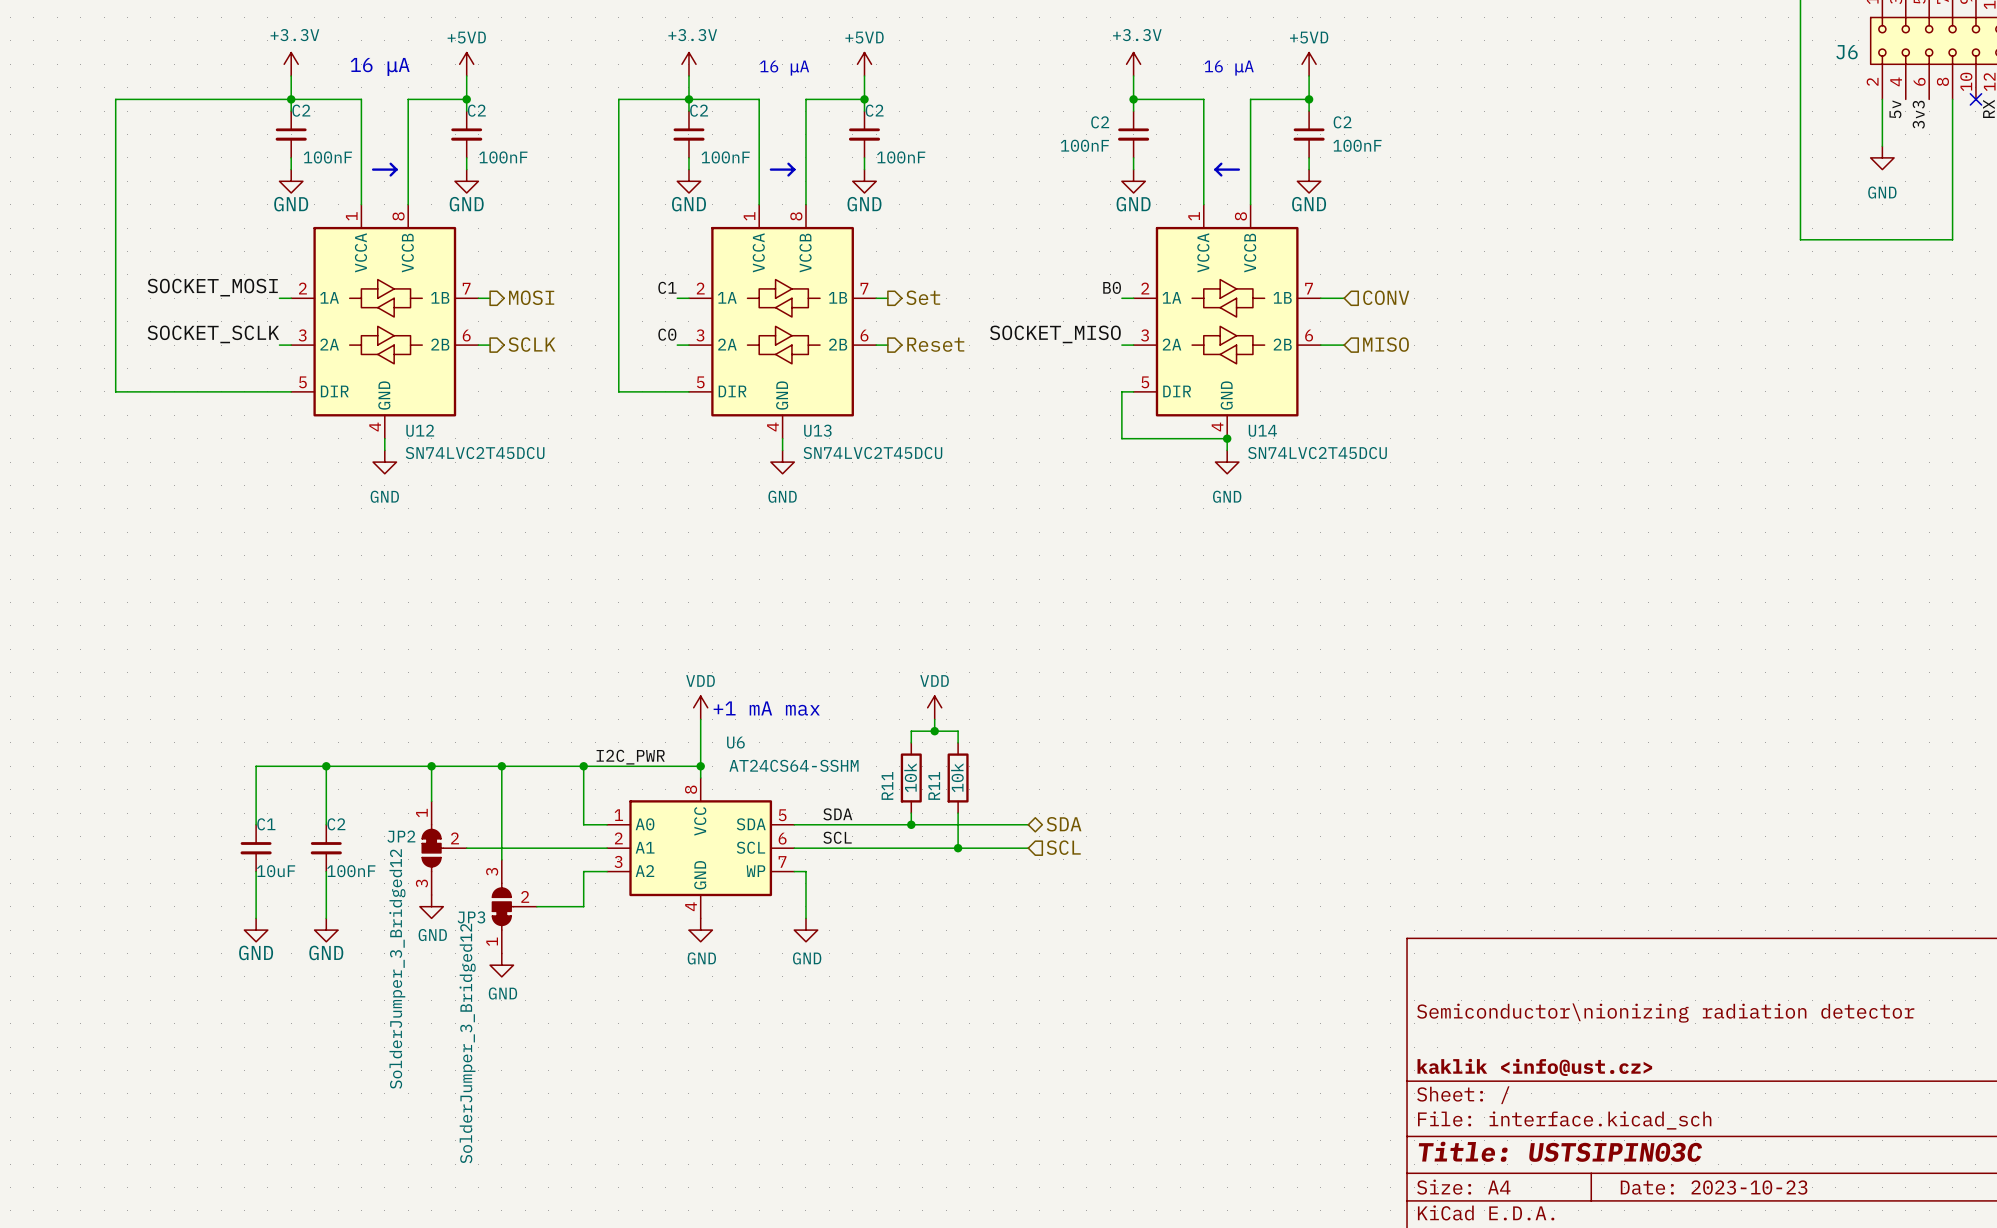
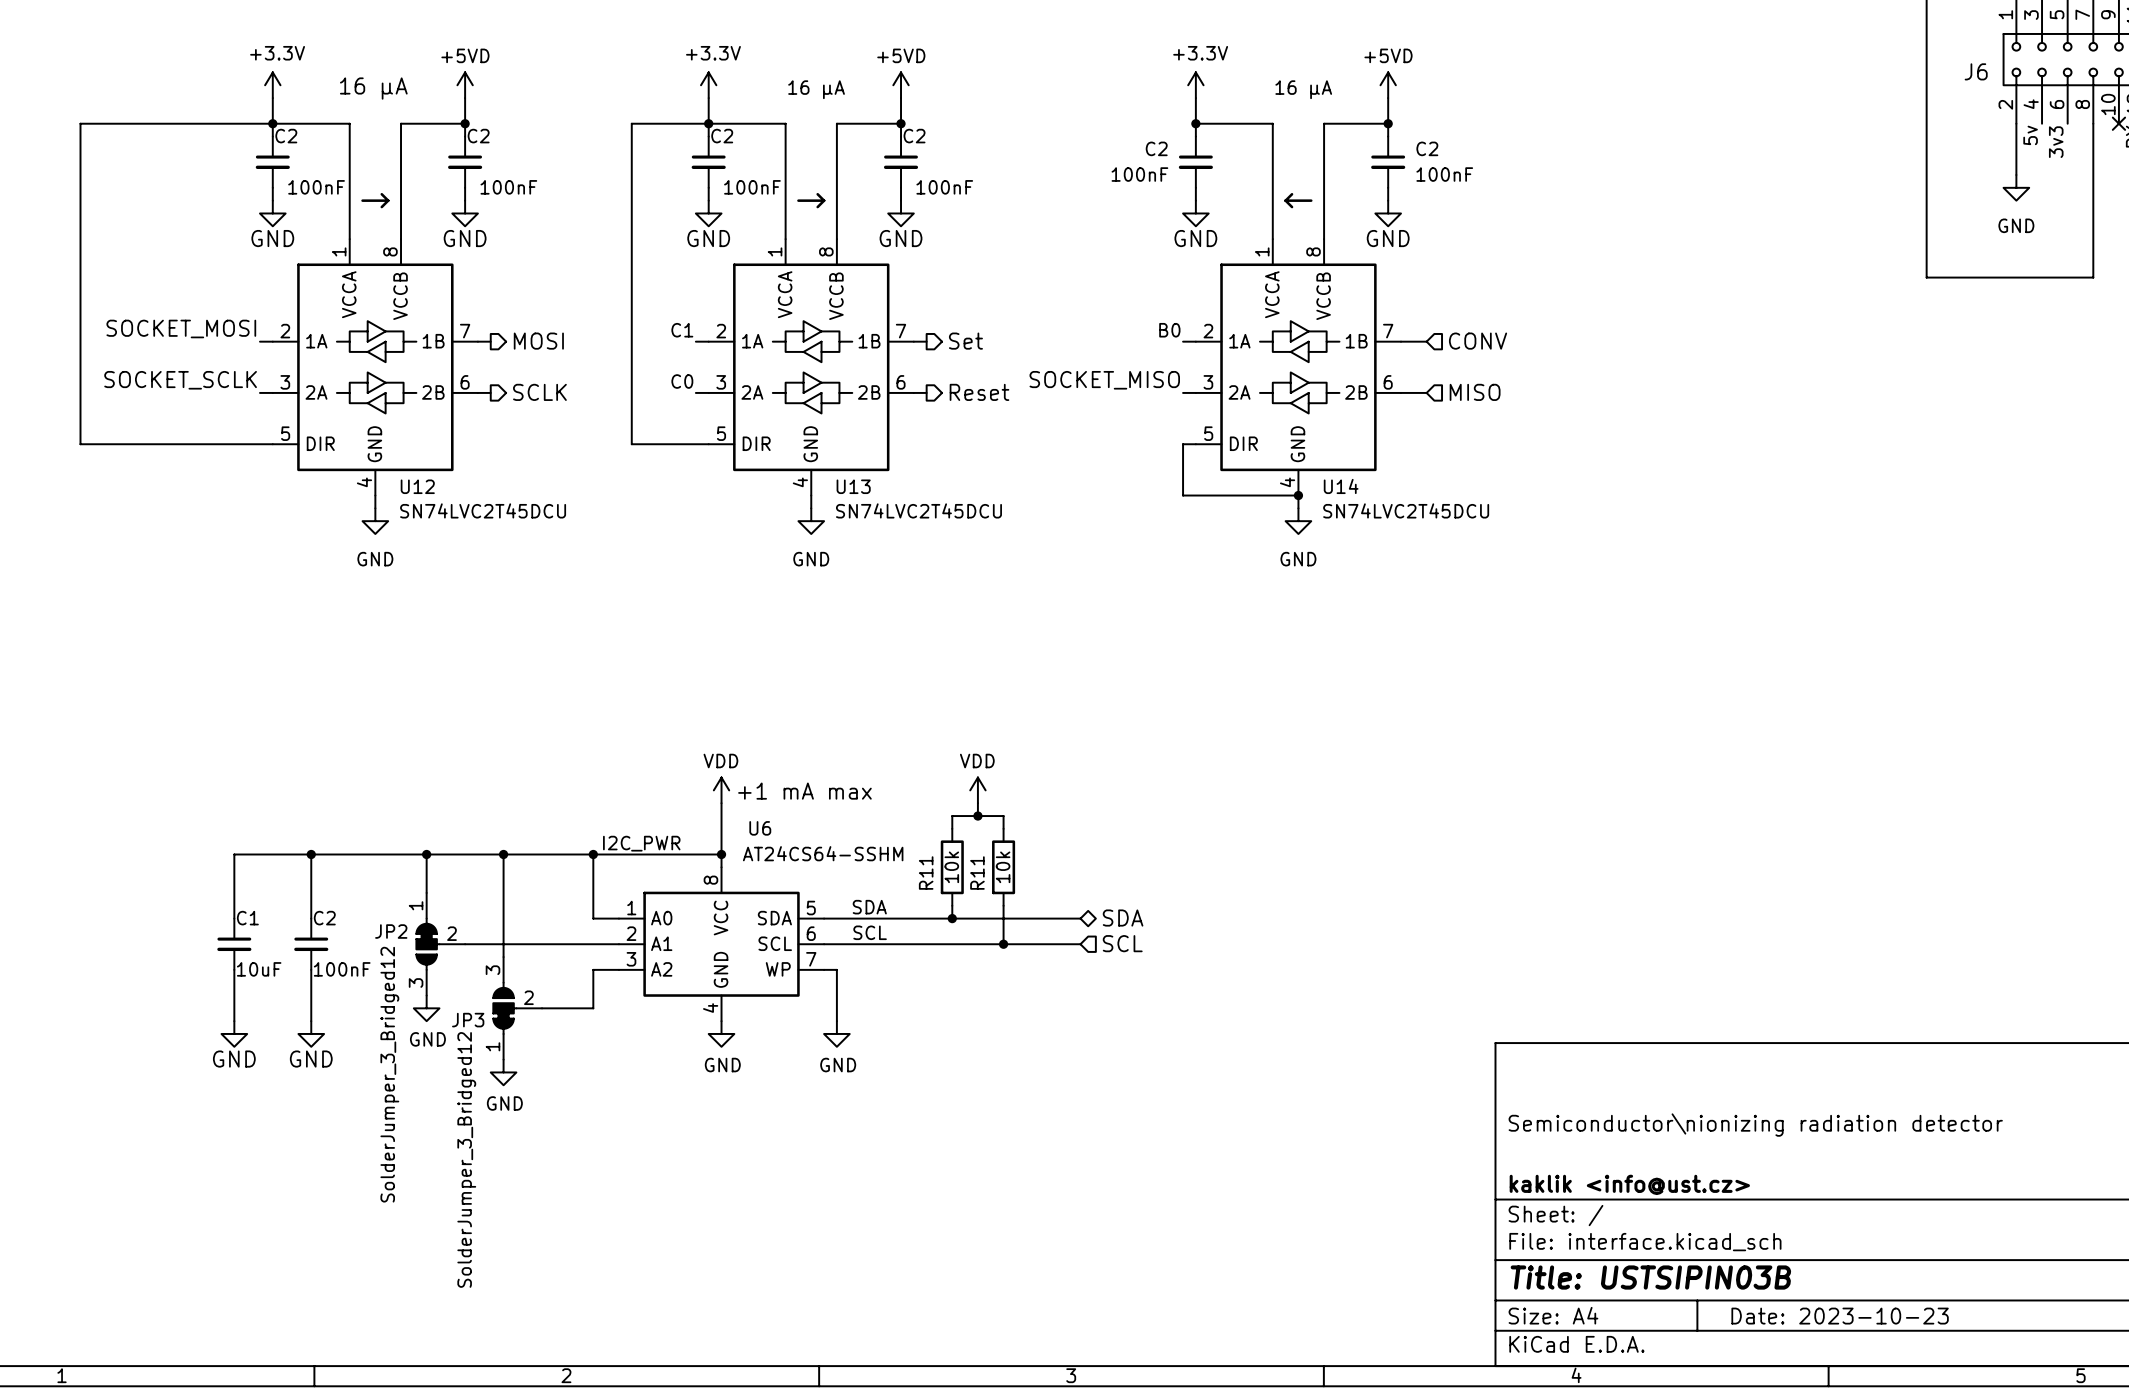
title block: Title: USTSIPIN03C (1560, 1151) -> Title: USTSIPIN03B (1650, 1277)

